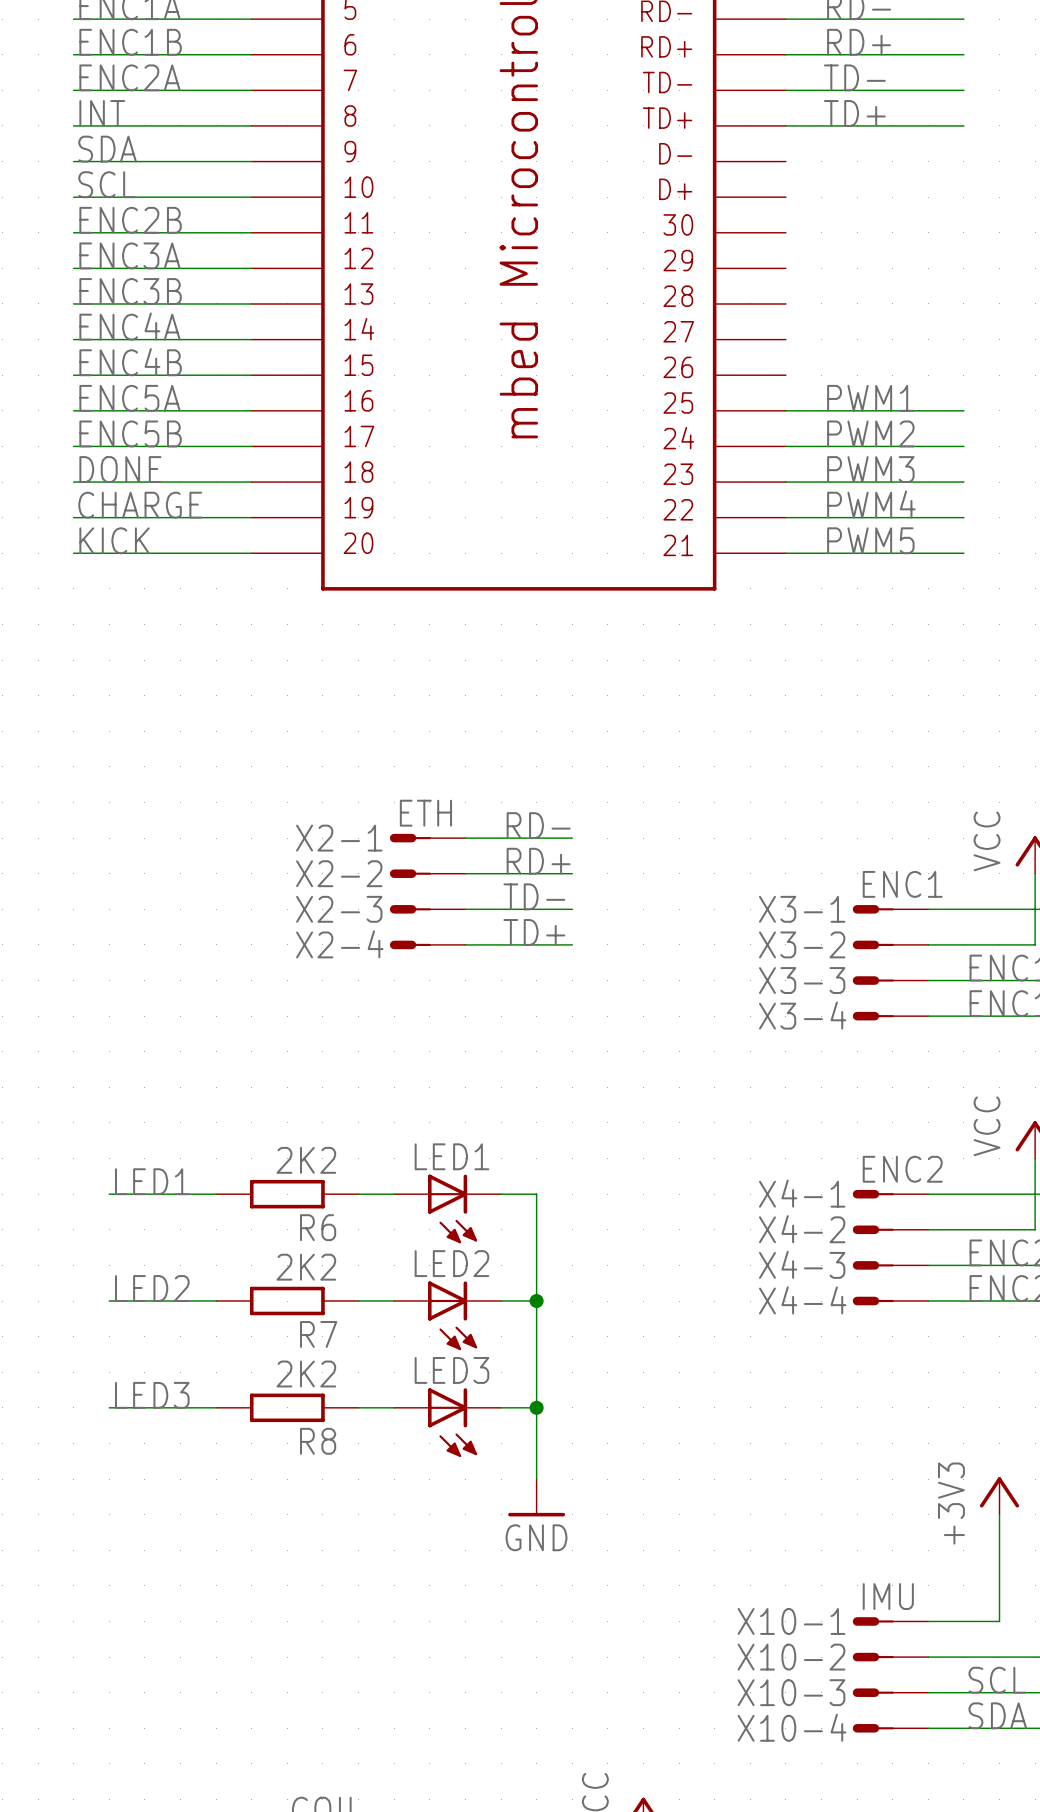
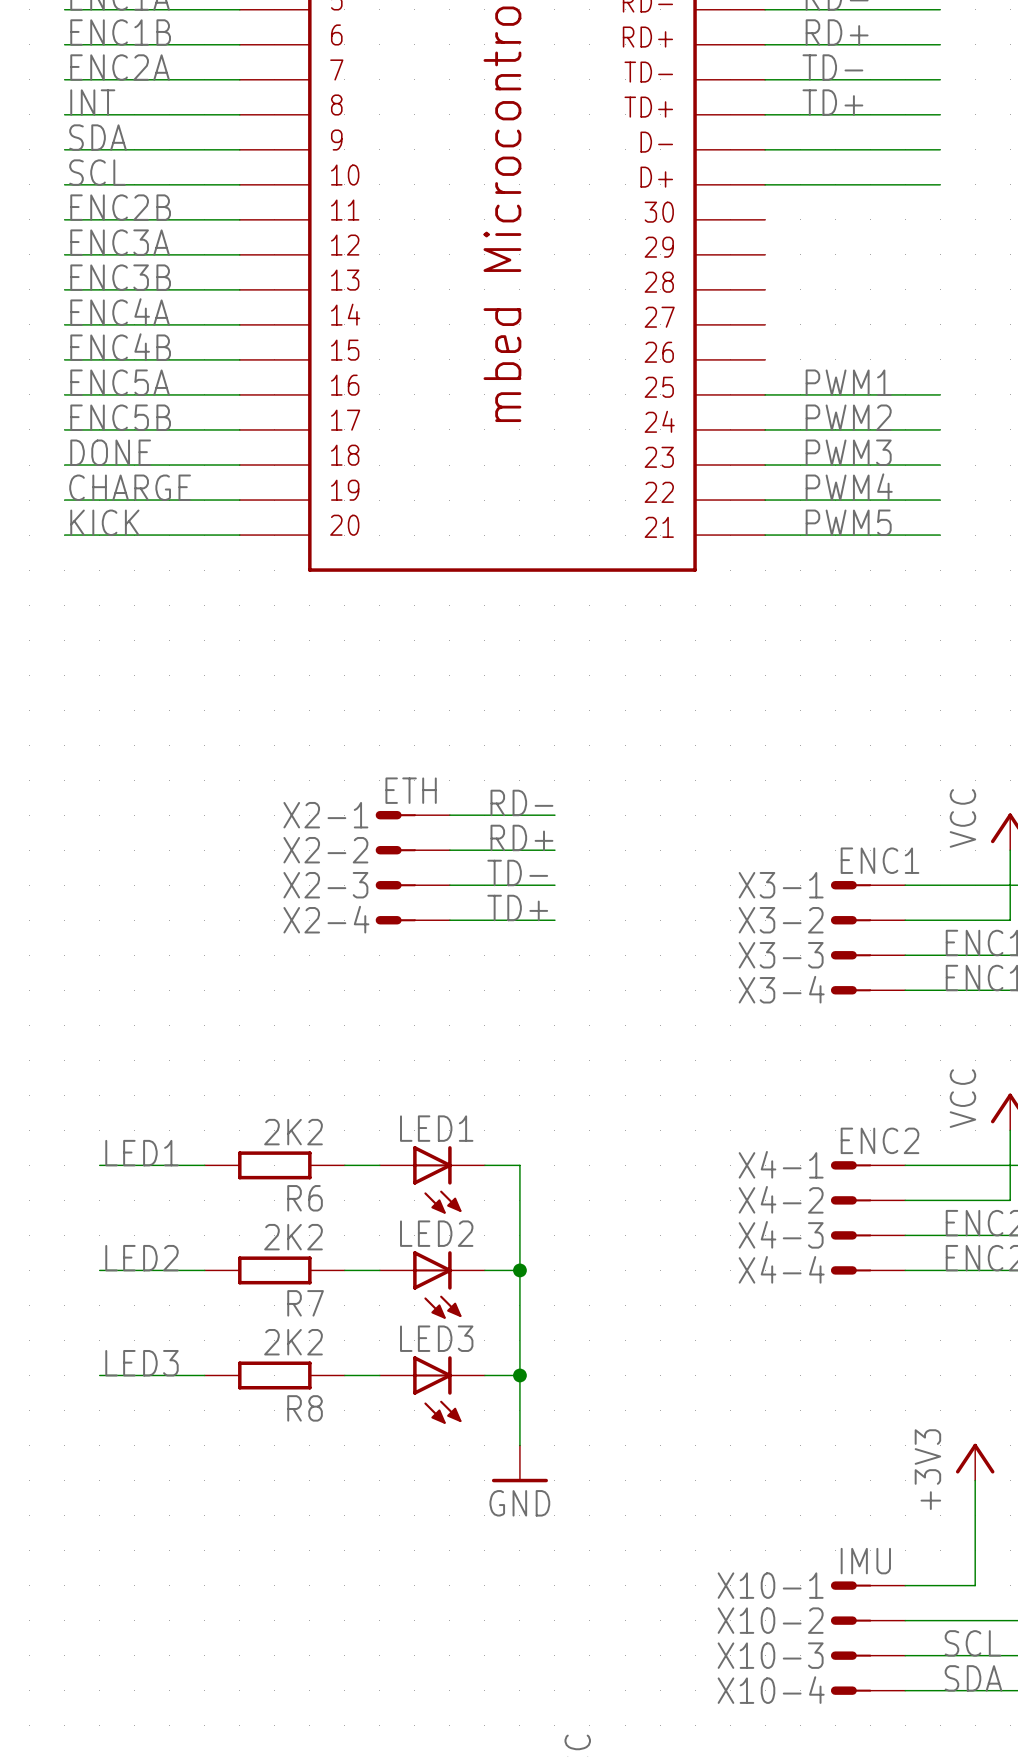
wire: none -> (765, 149) (940, 149)
wire: none -> (765, 184) (940, 184)

